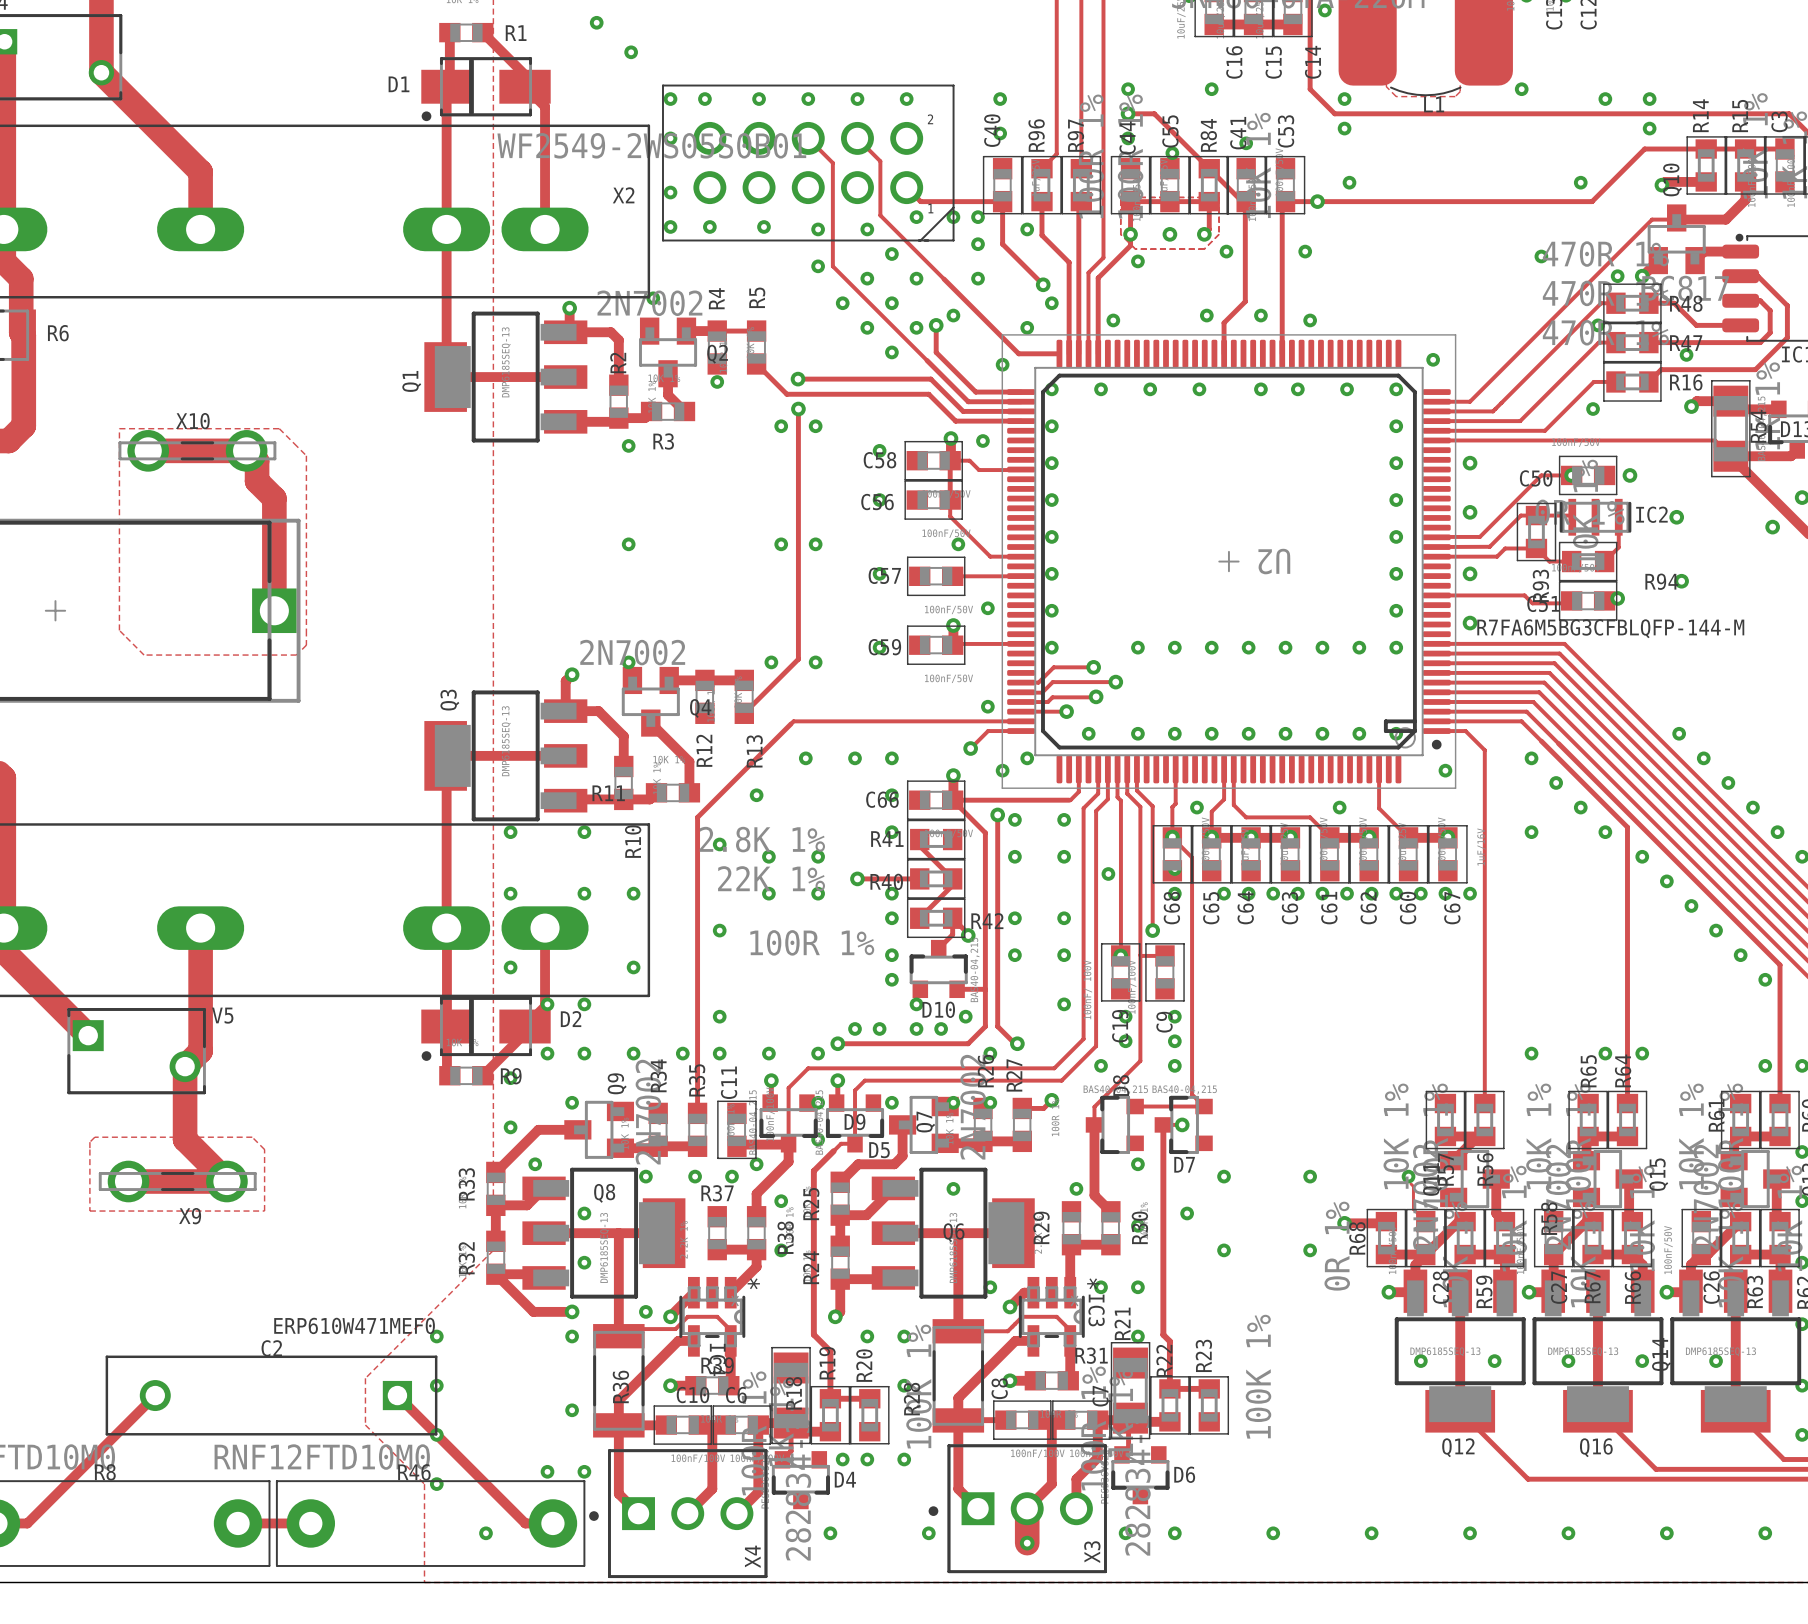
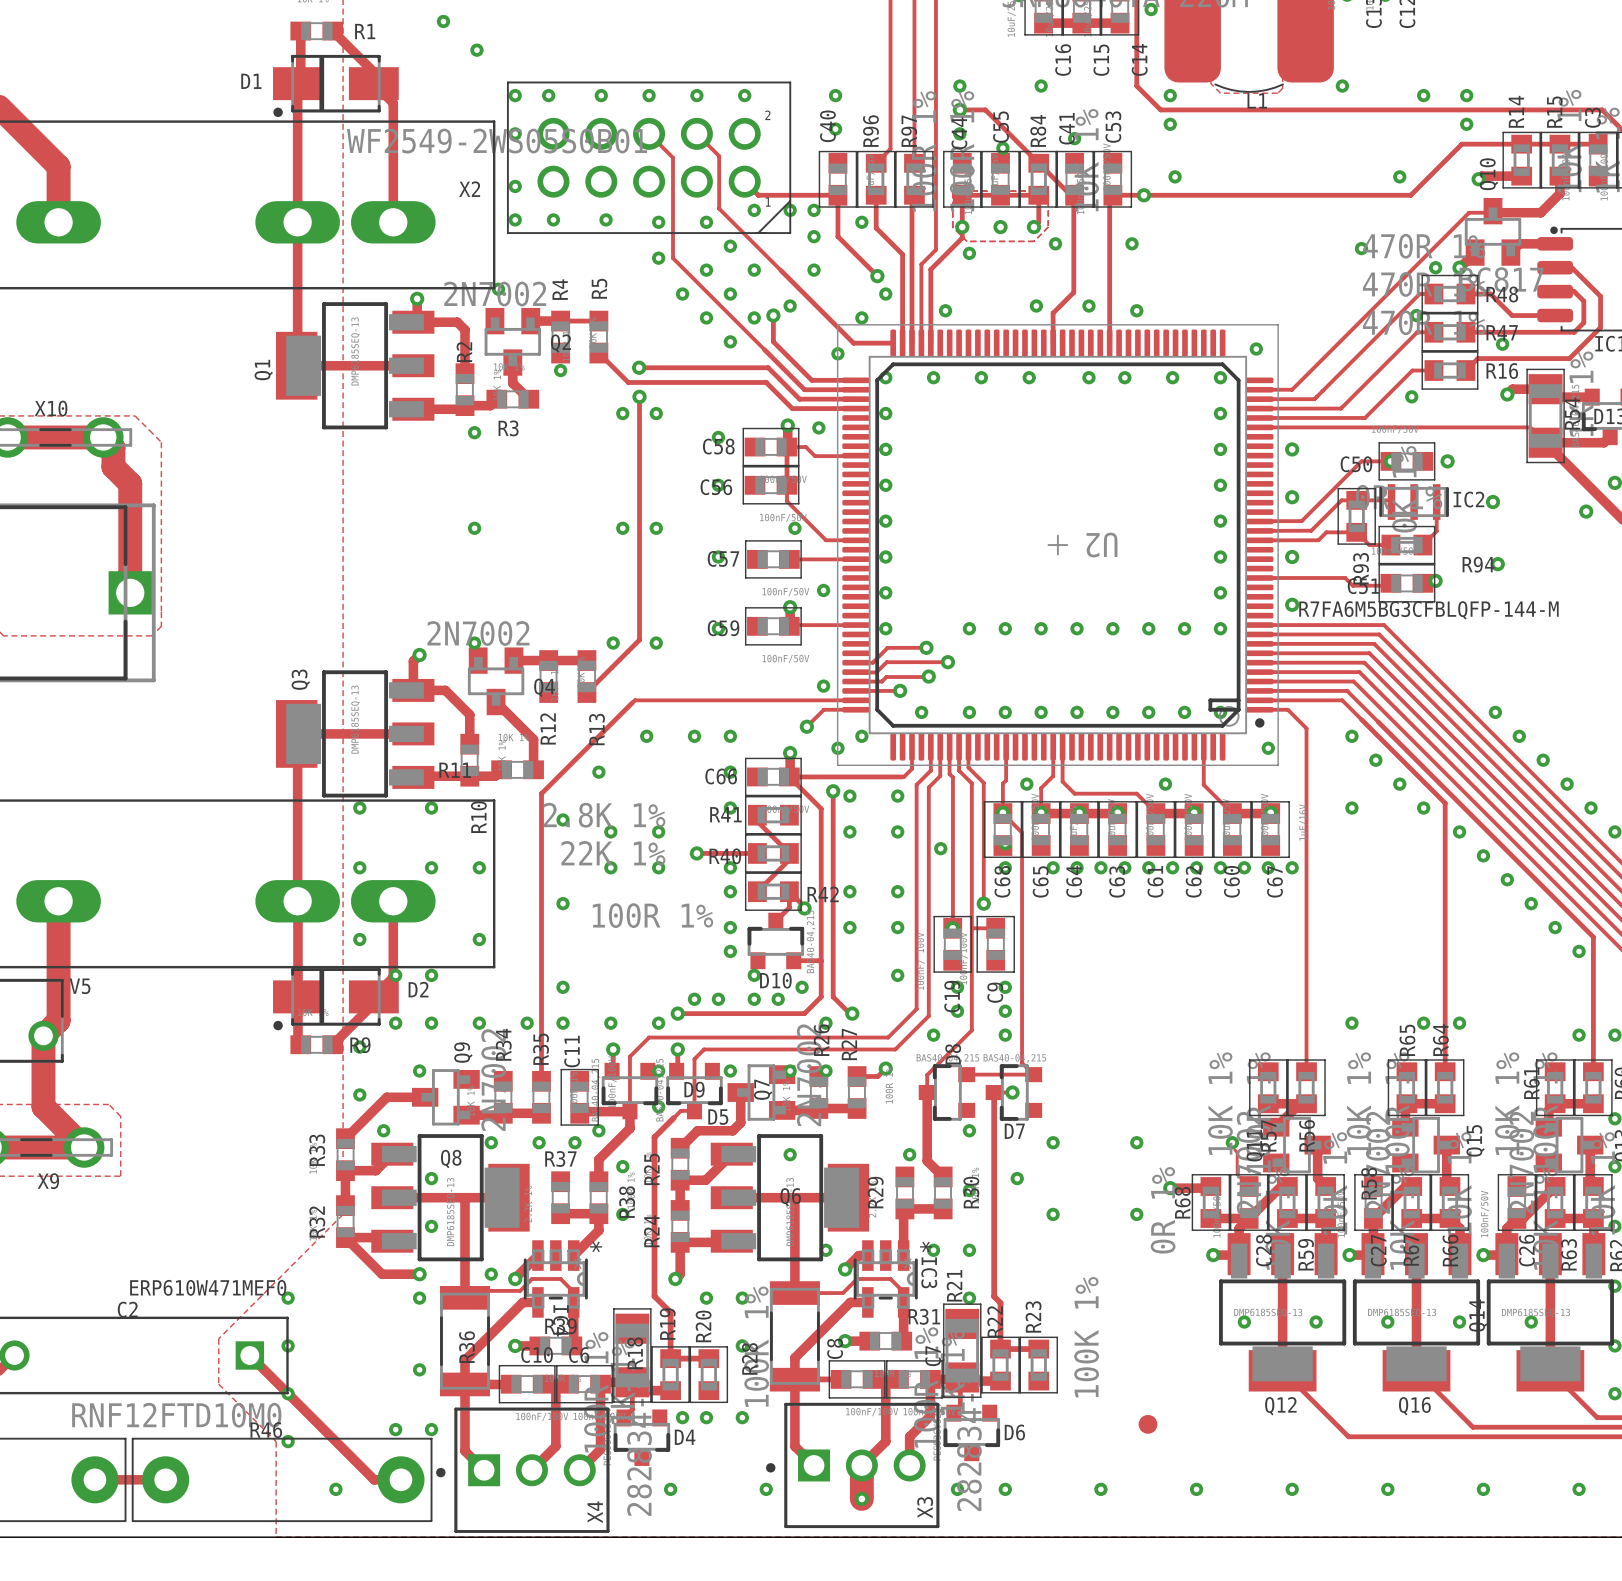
part: none -> (1148, 1424)

